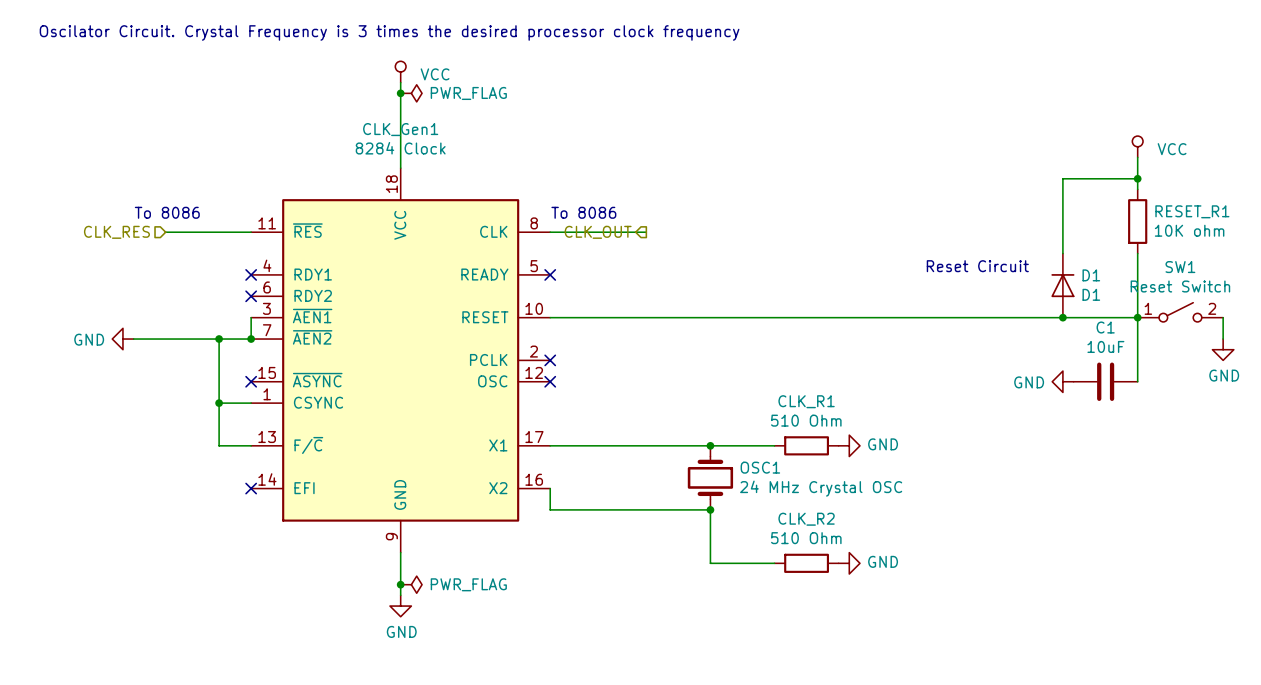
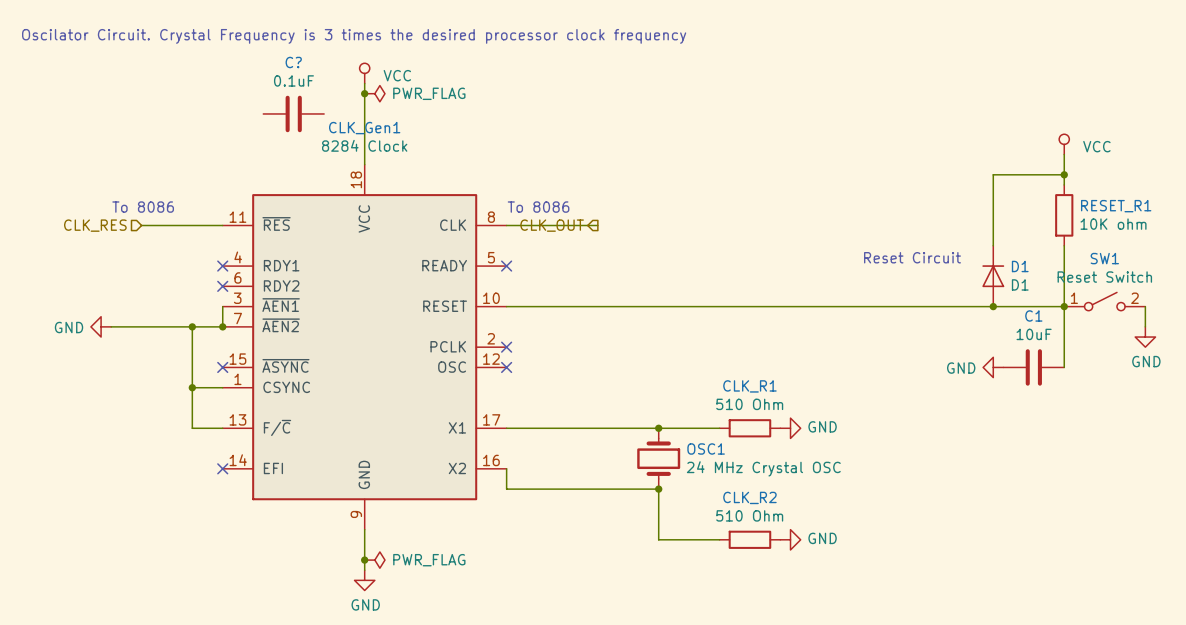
C?: none -> 0.1uF (293, 113)

